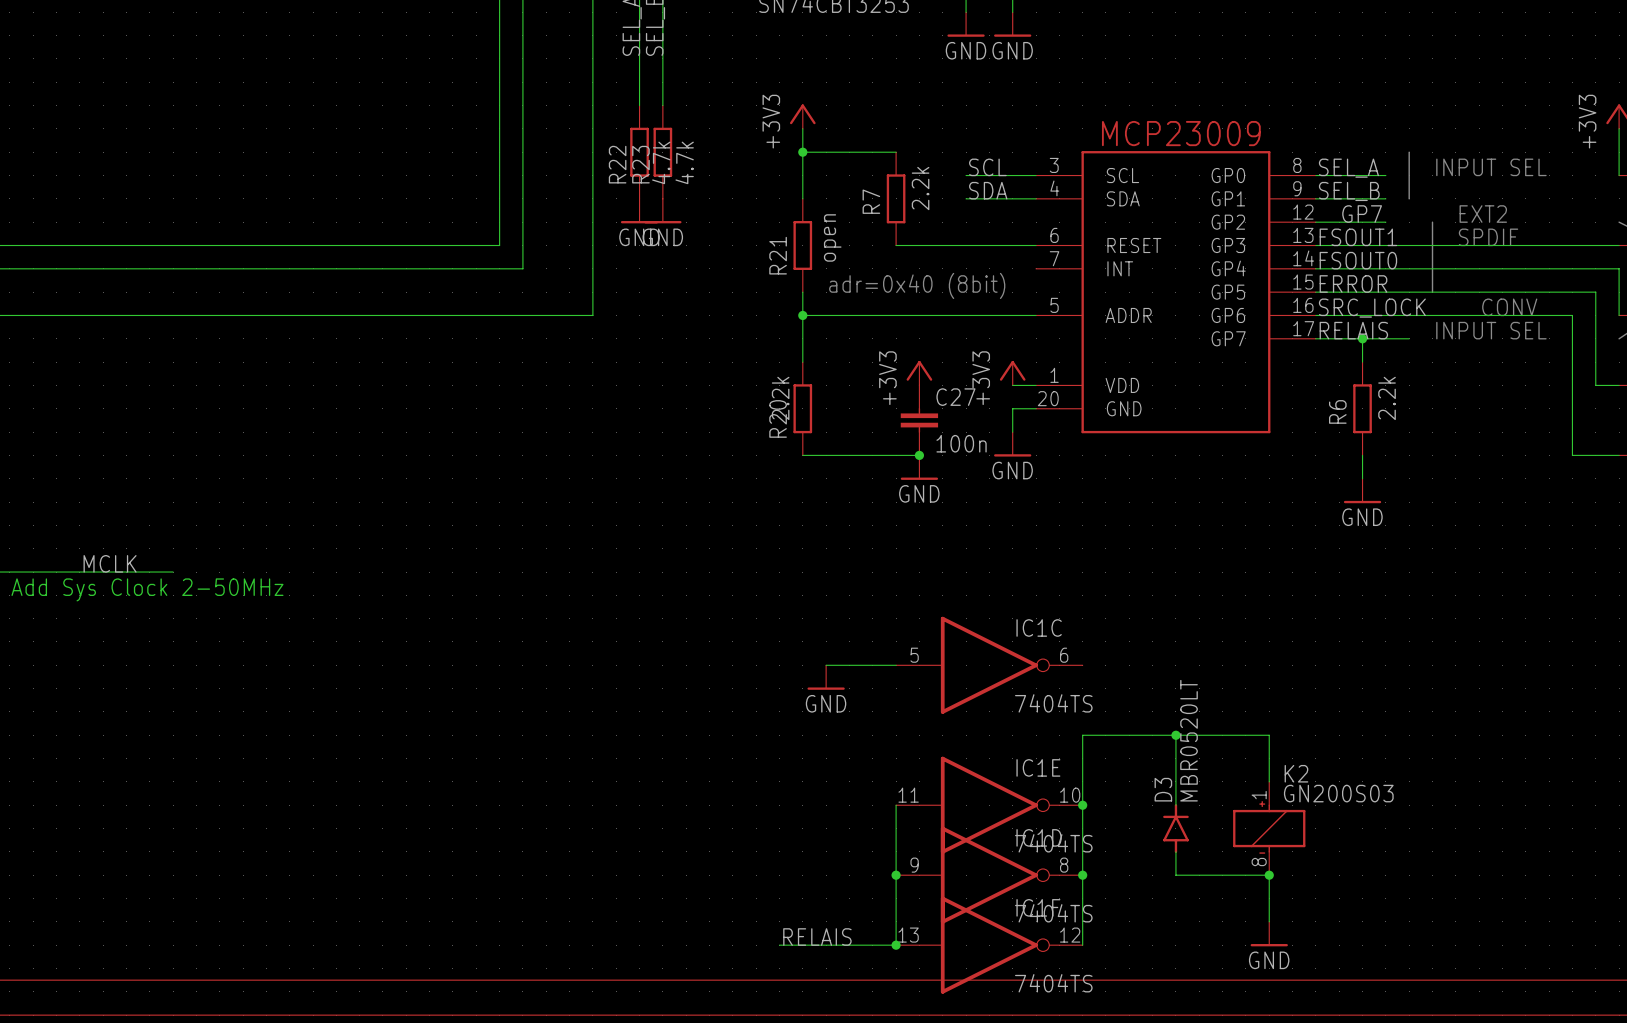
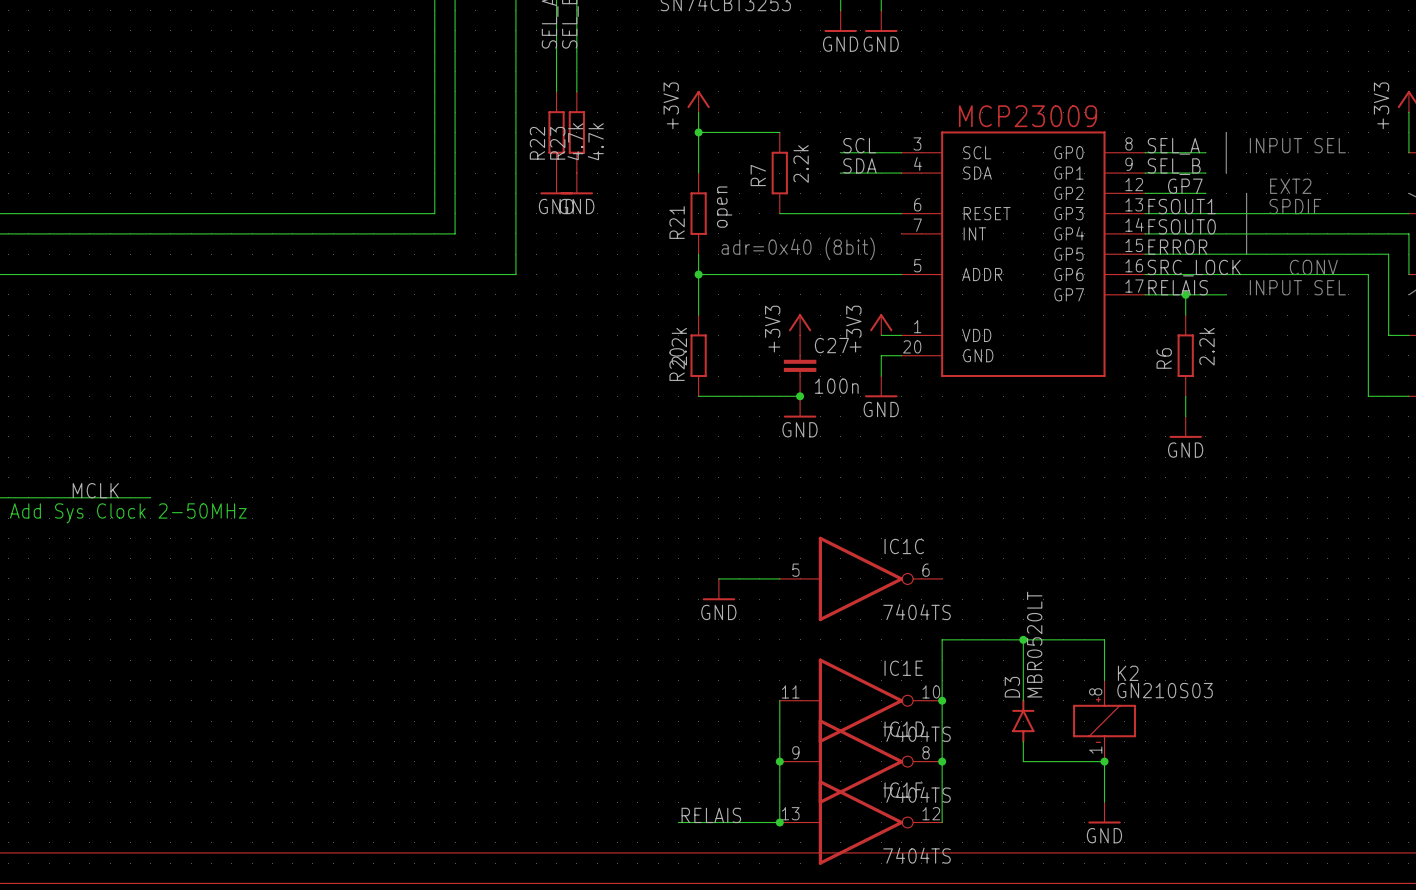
K2 value: GN200S03 (1338, 793) -> GN210S03 (1165, 690)
K2 pin number: 1 (1259, 795) -> 8 (1095, 691)
K2 pin number: 8 (1259, 862) -> 1 (1095, 750)

